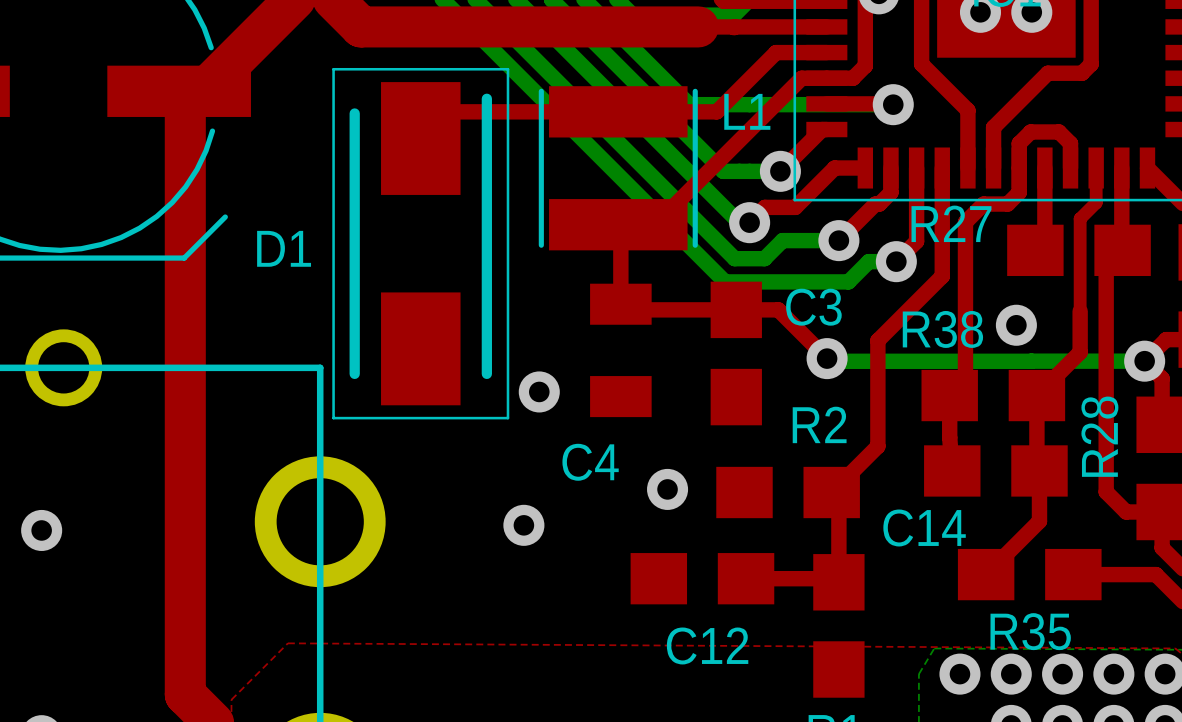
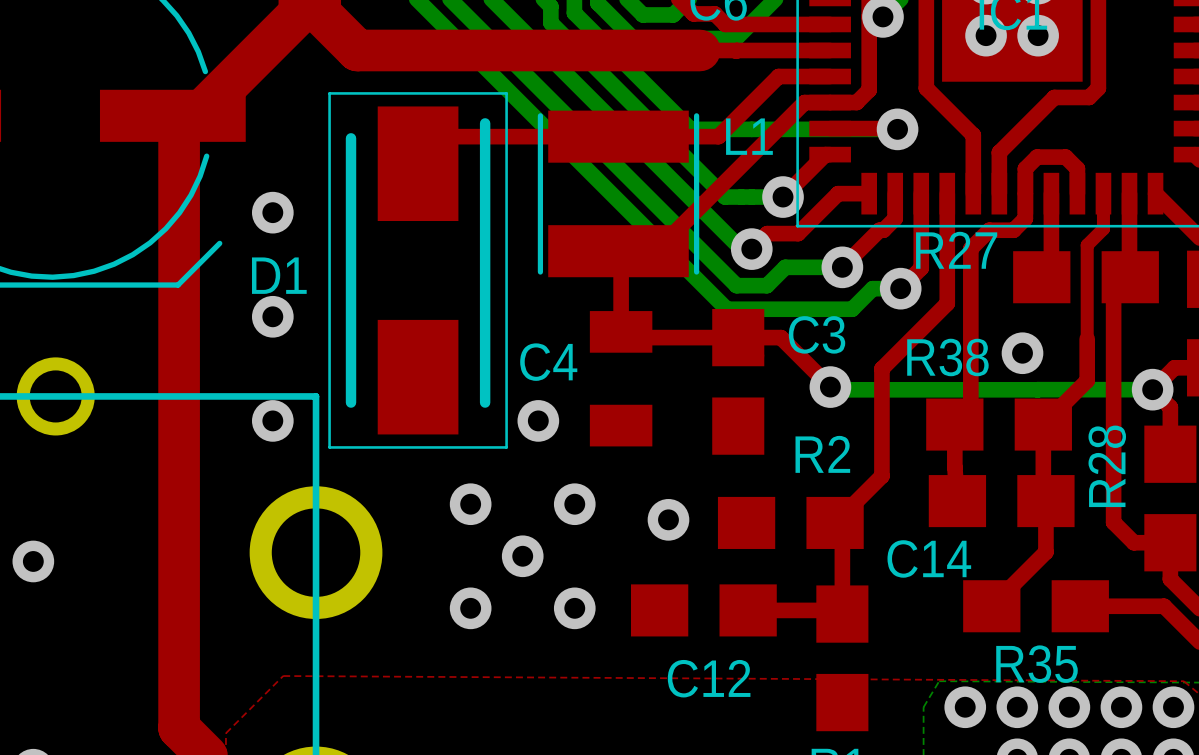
via: none -> (272, 212)
via: none -> (272, 316)
via: none -> (272, 420)
C4 name position: C4 (590, 462) -> C4 (548, 362)
via: none -> (470, 504)
via: none -> (574, 504)
via: none -> (470, 608)
via: none -> (574, 608)

